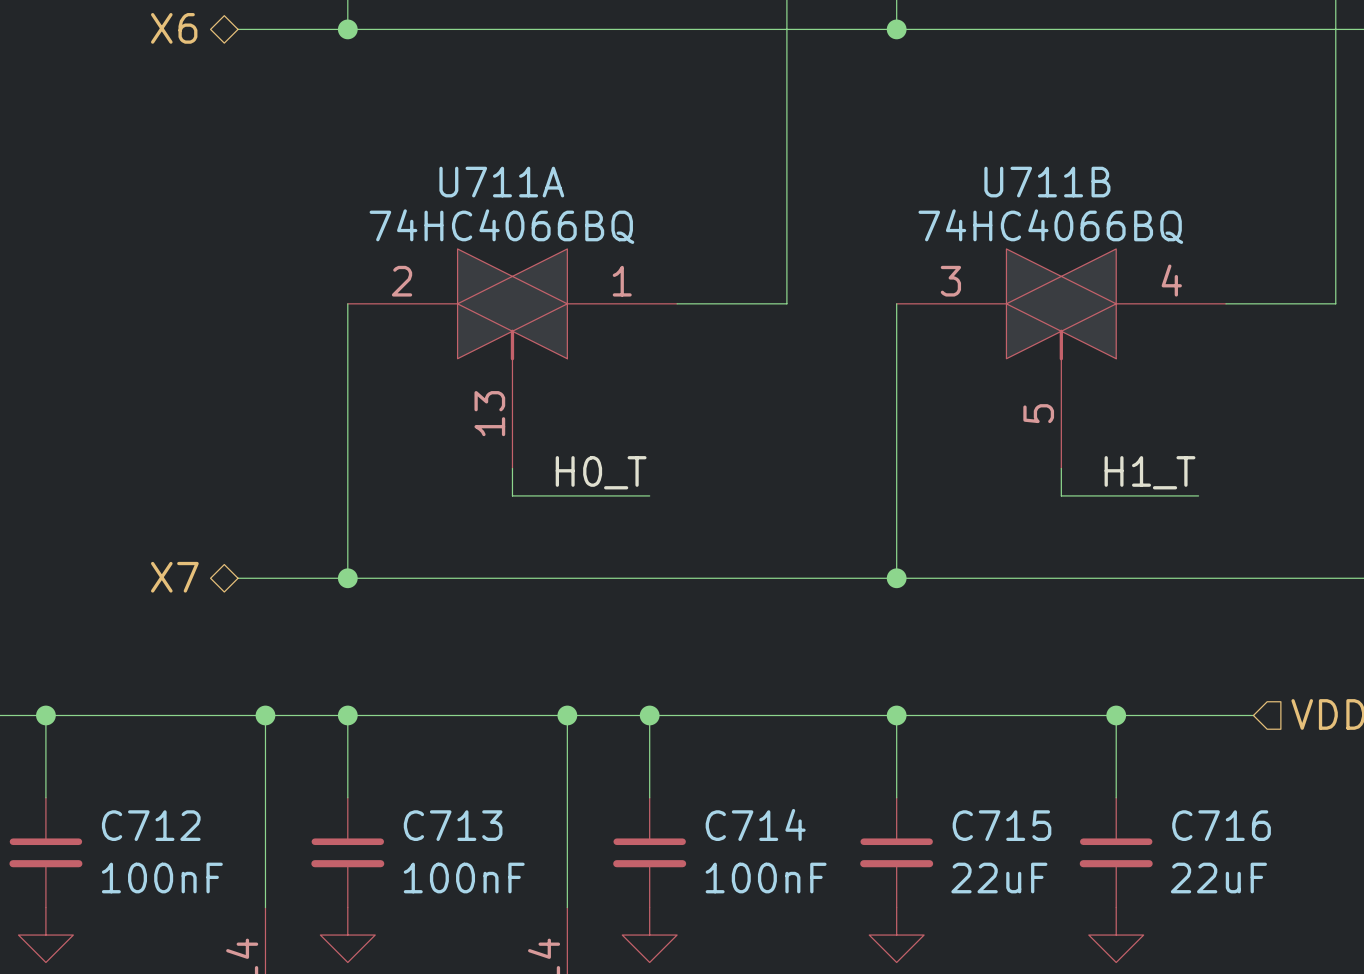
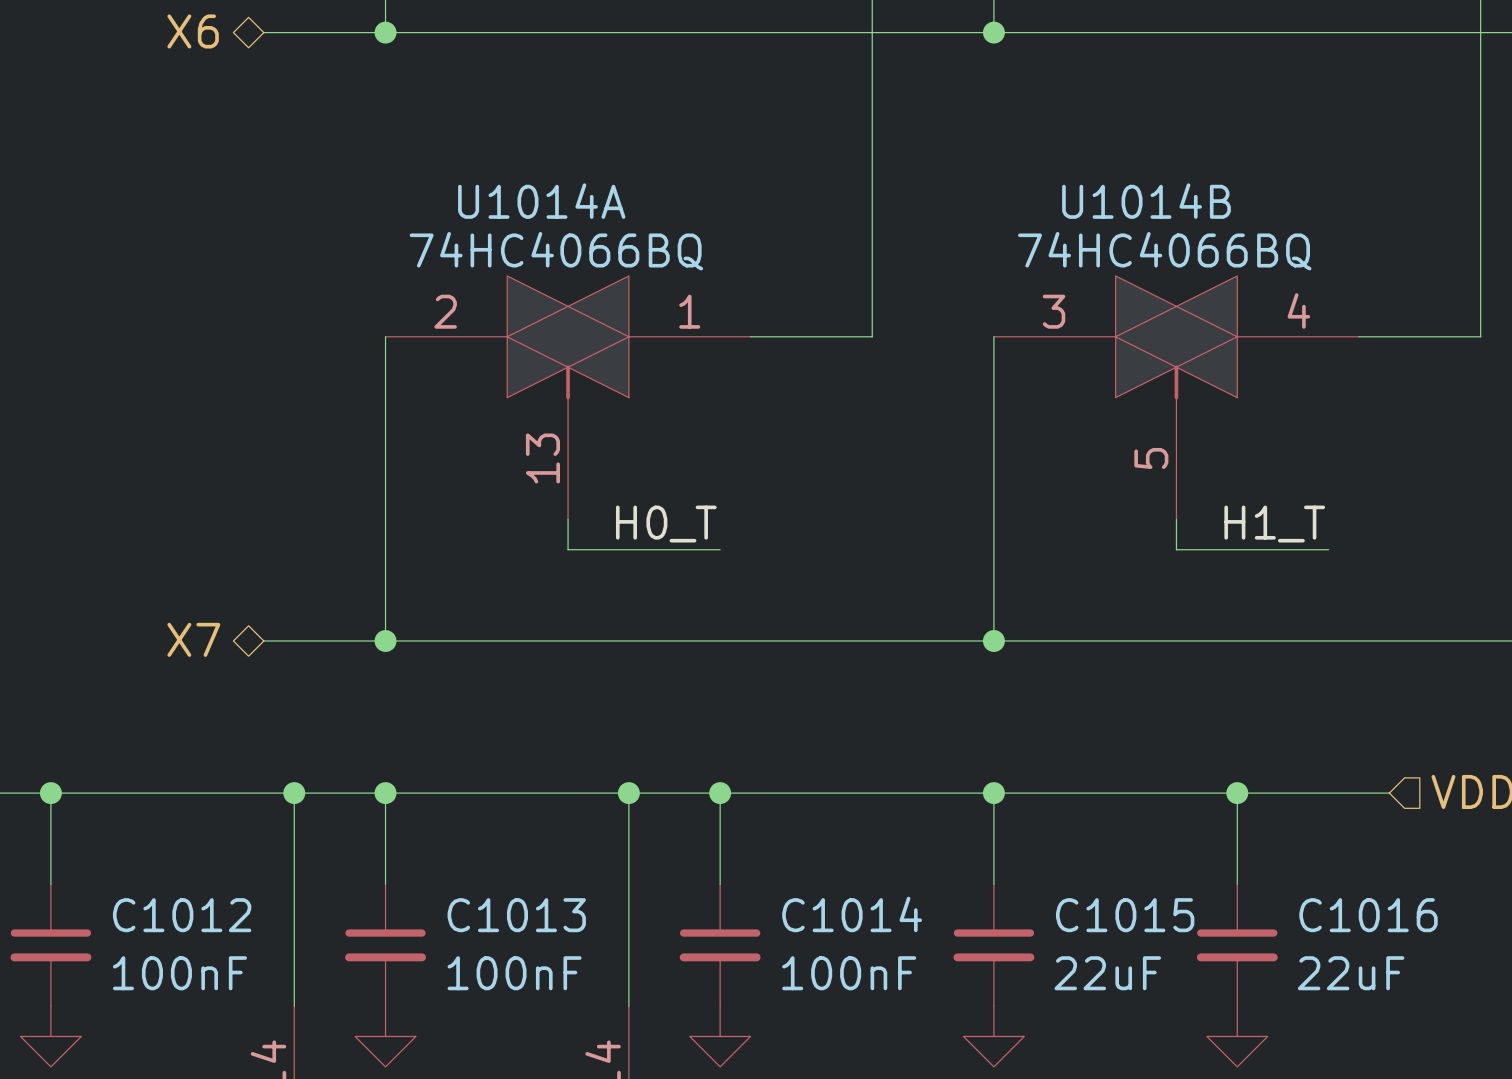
U711A name: U711A (501, 182) -> U1014A (541, 201)
U711B name: U711B (1047, 182) -> U1014B (1146, 201)
C714 name: C714 (755, 824) -> C1014 (852, 914)
C712 name: C712 (151, 825) -> C1012 (182, 915)
C713 name: C713 (453, 825) -> C1013 (516, 915)
C715 name: C715 (1001, 825) -> C1015 (1125, 915)
C716 name: C716 (1221, 825) -> C1016 (1368, 915)

